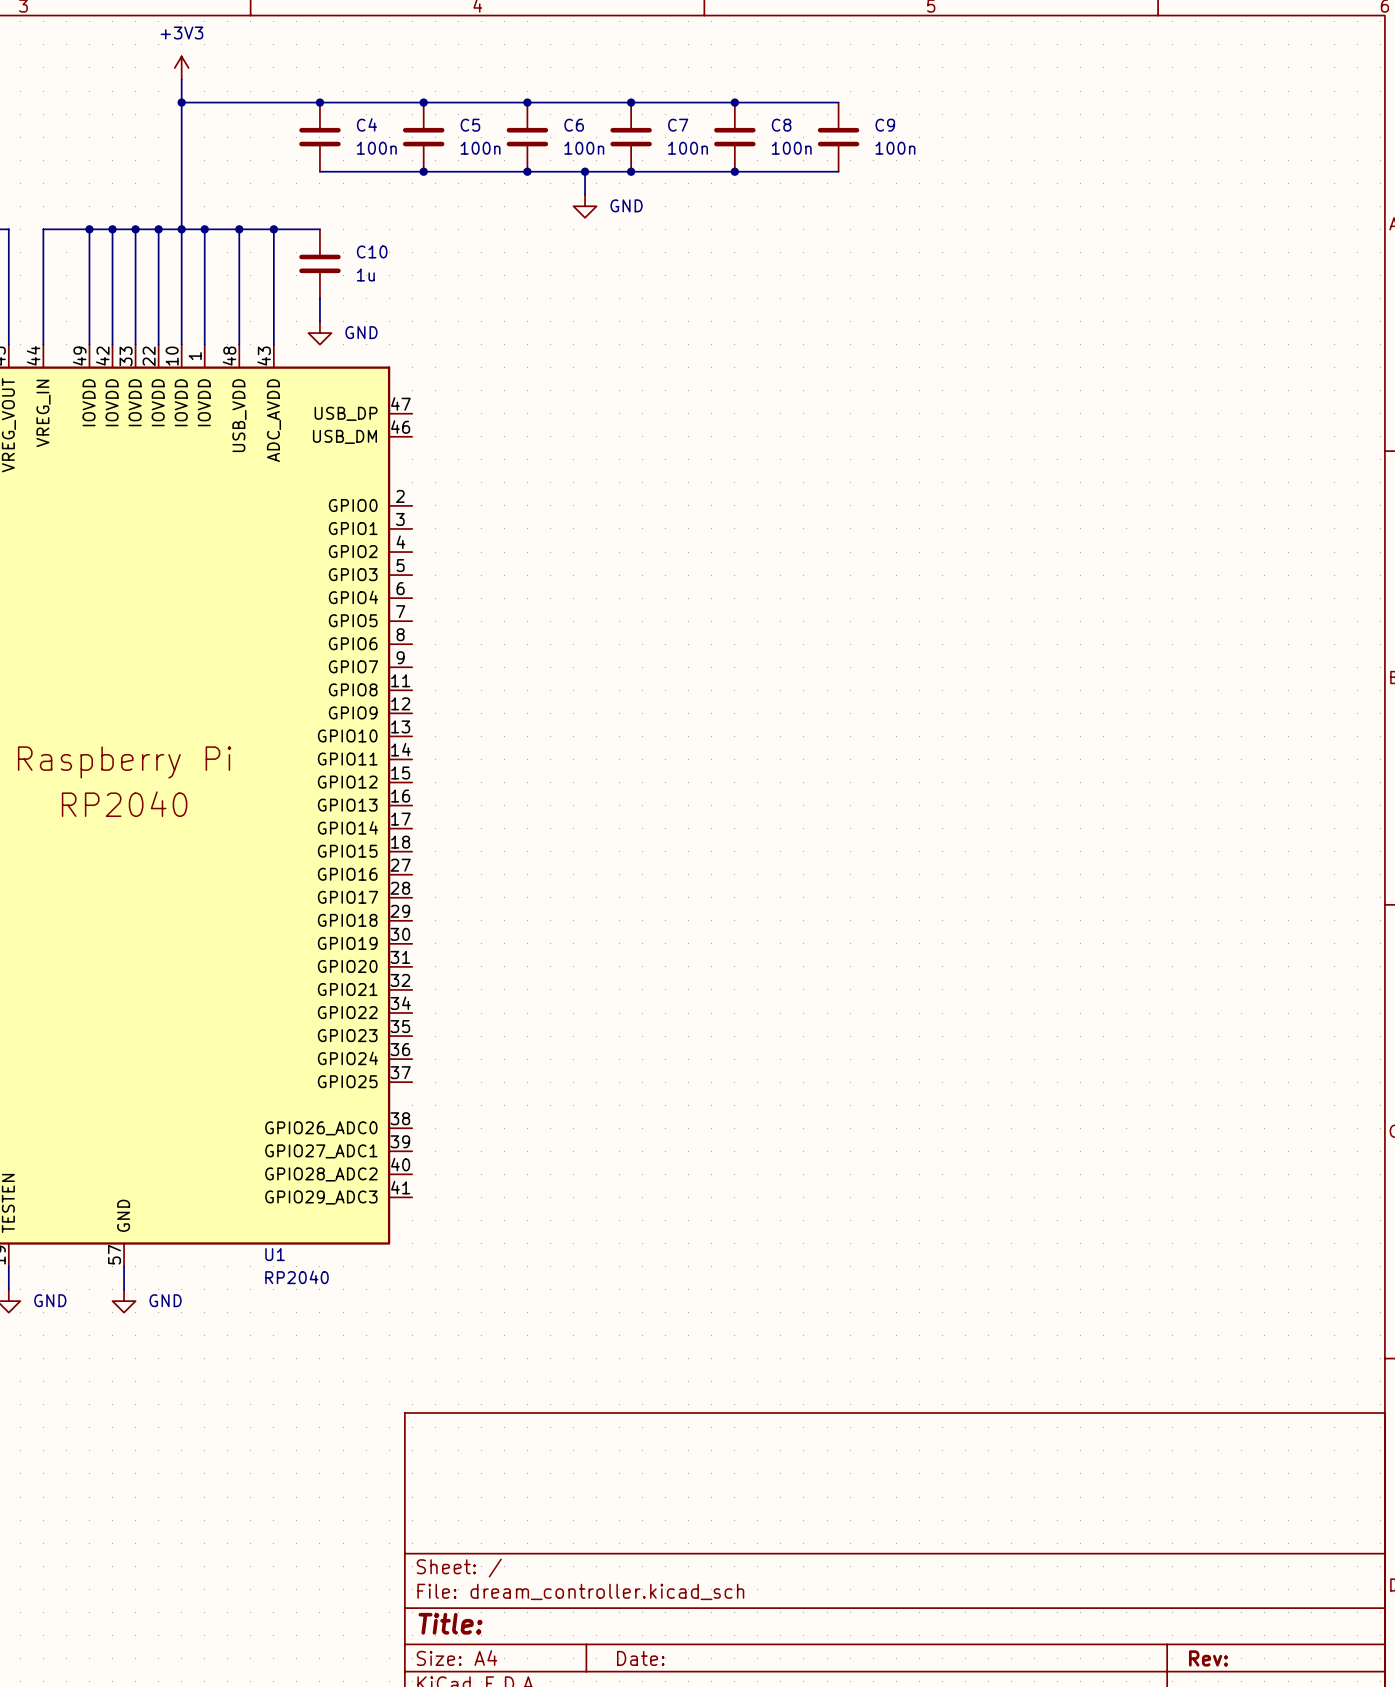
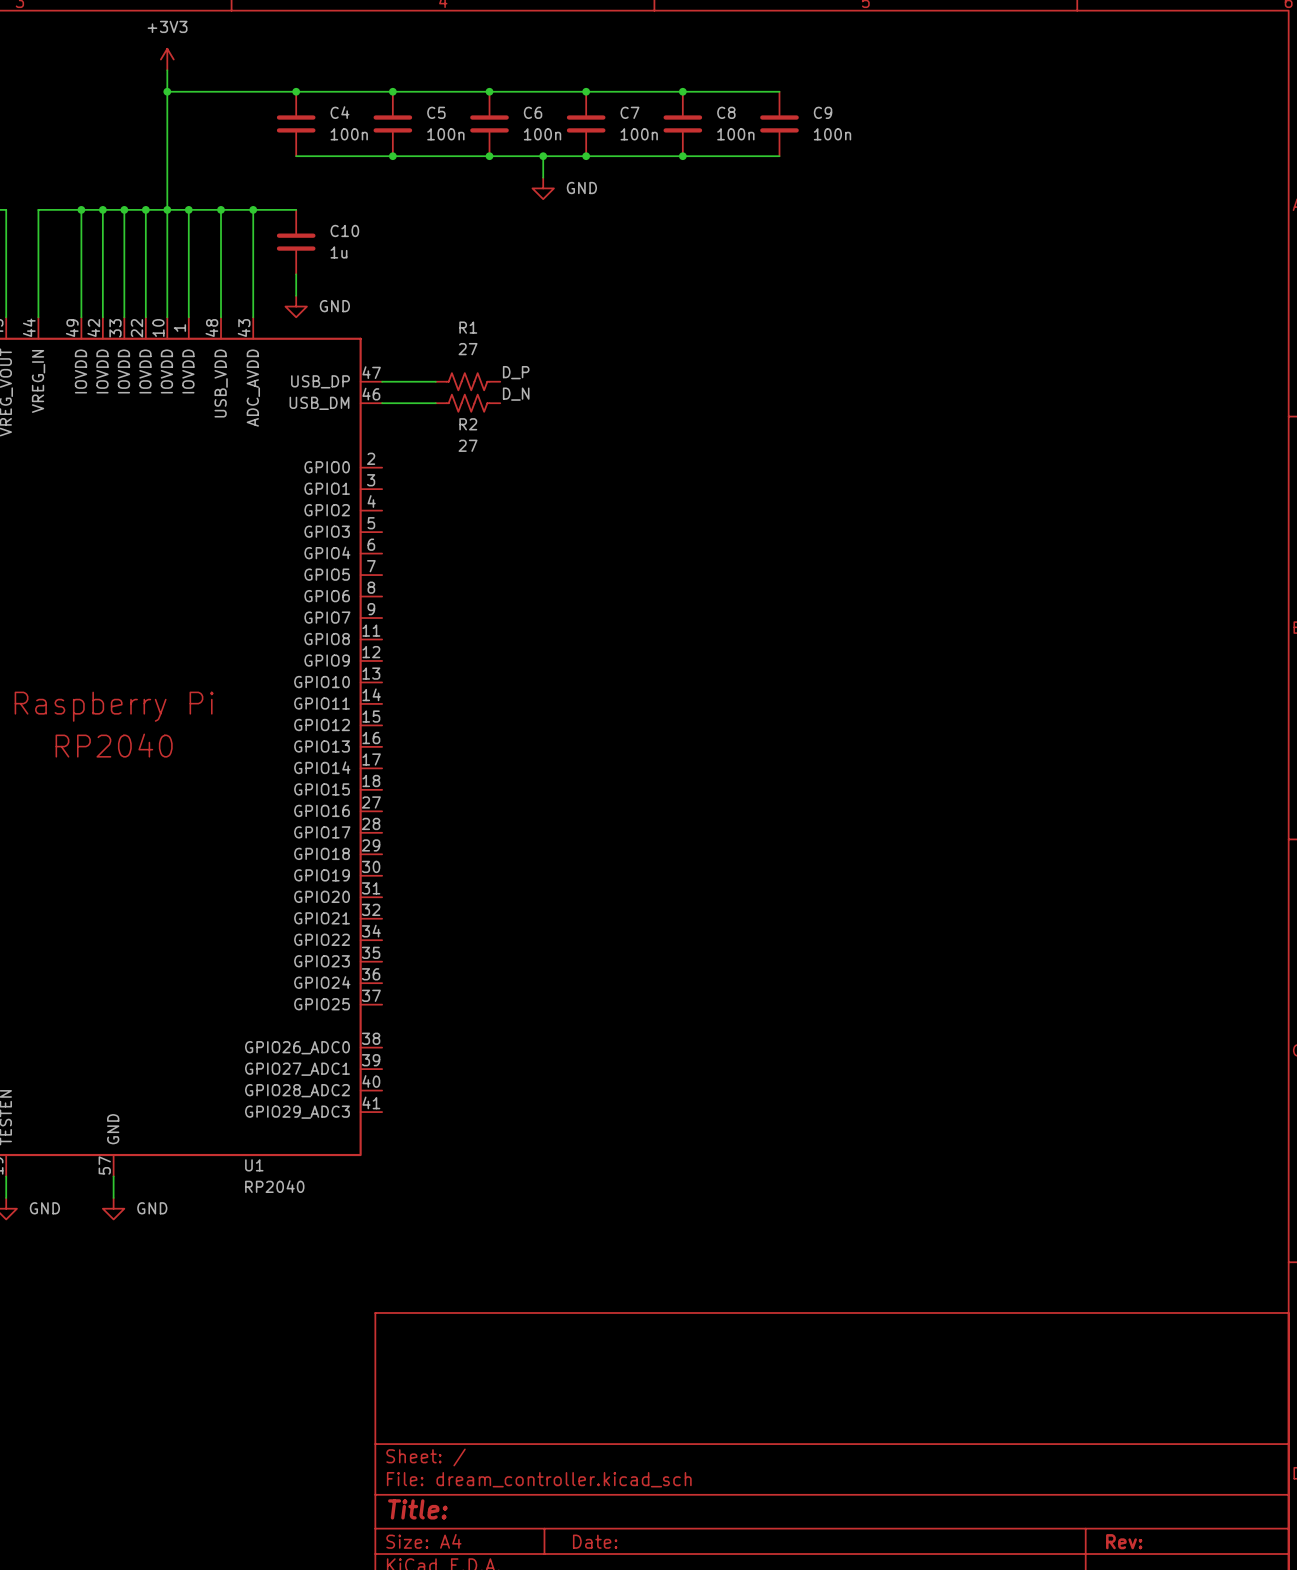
label: none -> D_P (516, 372)
wire: none -> (382, 381) (435, 381)
R1: none -> 27 (468, 381)
label: none -> D_N (516, 394)
wire: none -> (382, 403) (435, 403)
R2: none -> 27 (468, 403)

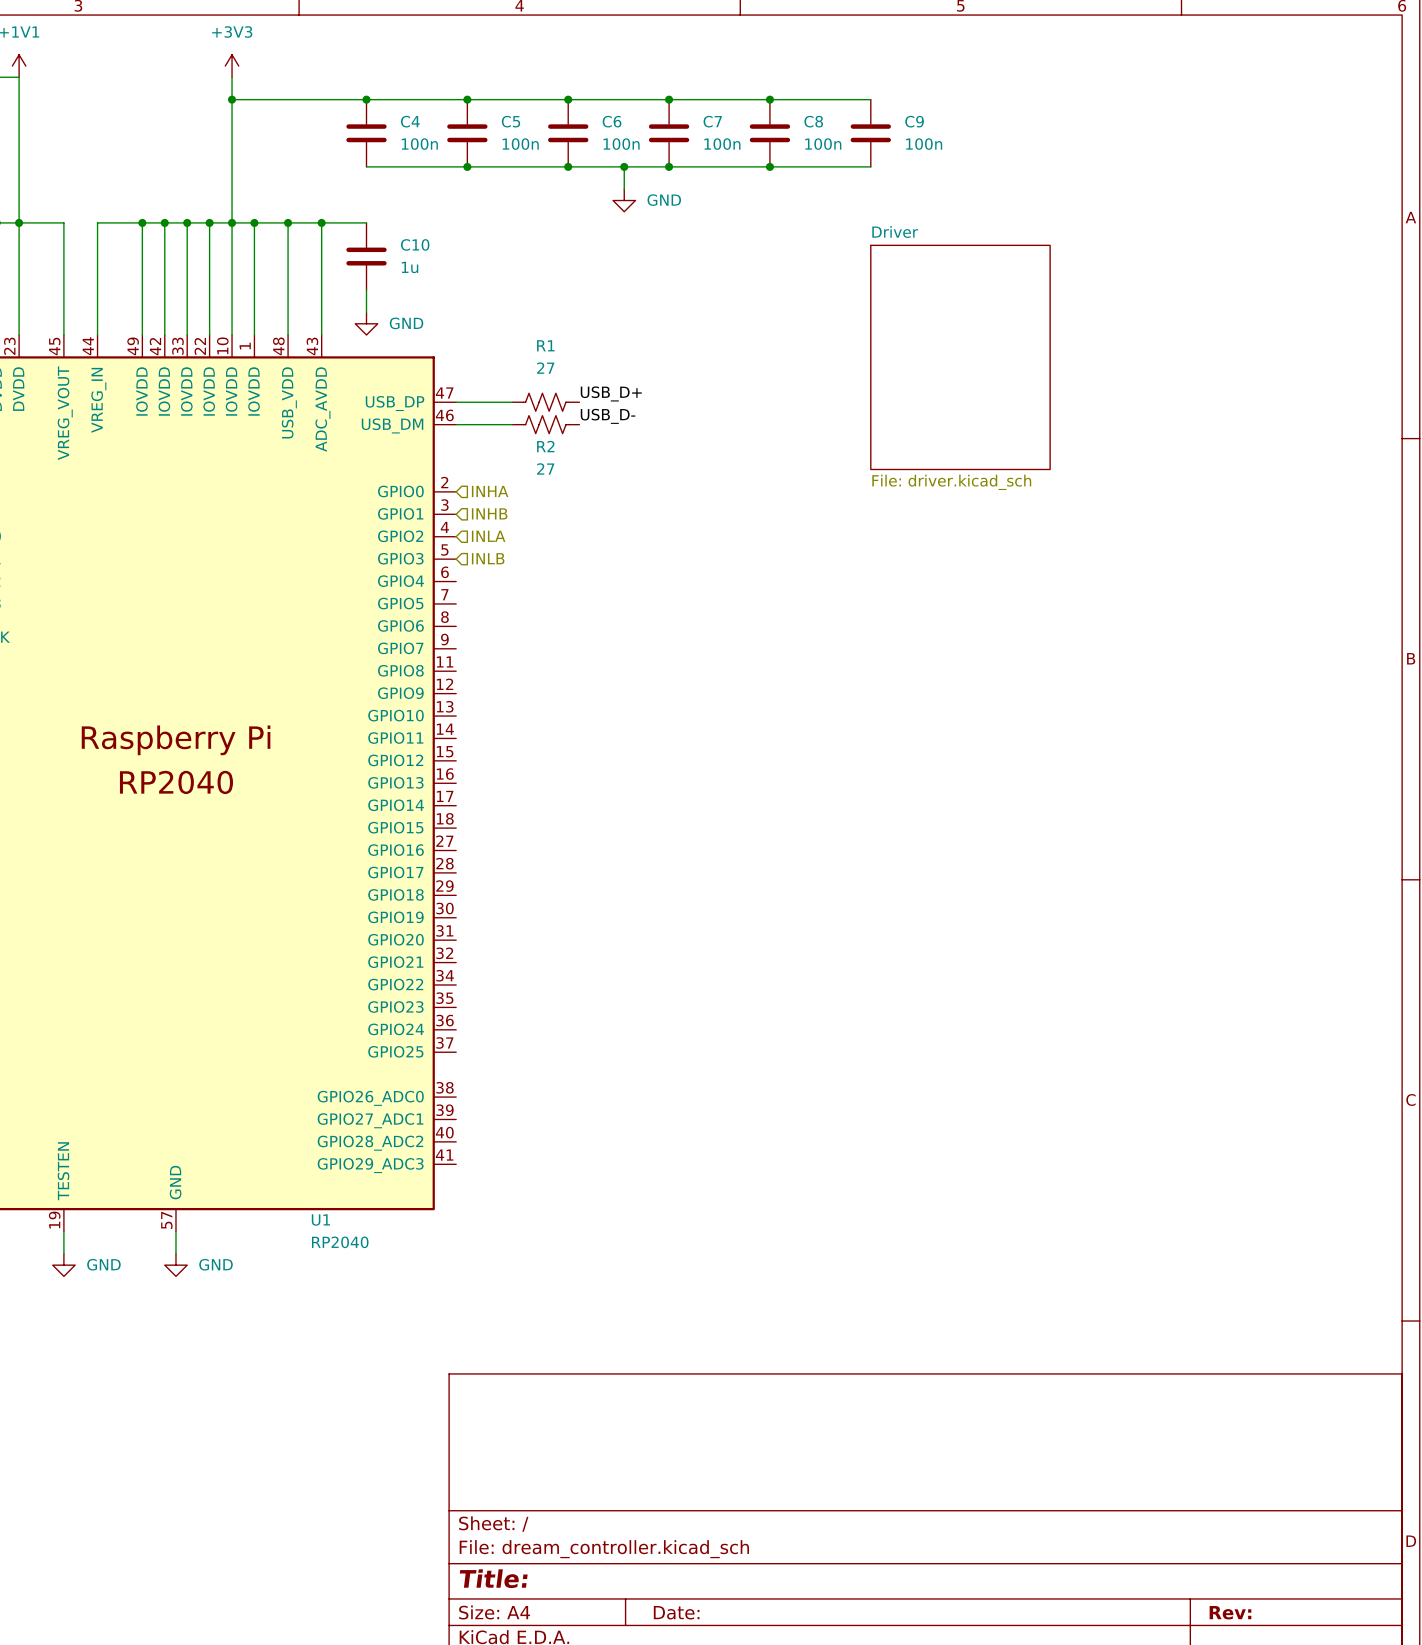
sheet Driver: none -> File: driver.kicad_sch (960, 357)
label: D_P (516, 372) -> USB_D+ (611, 393)
label: D_N (516, 394) -> USB_D- (608, 416)
hierarchical label: none -> INHA (490, 491)
hierarchical label: none -> INHB (489, 513)
hierarchical label: none -> INLA (488, 536)
hierarchical label: none -> INLB (488, 558)

